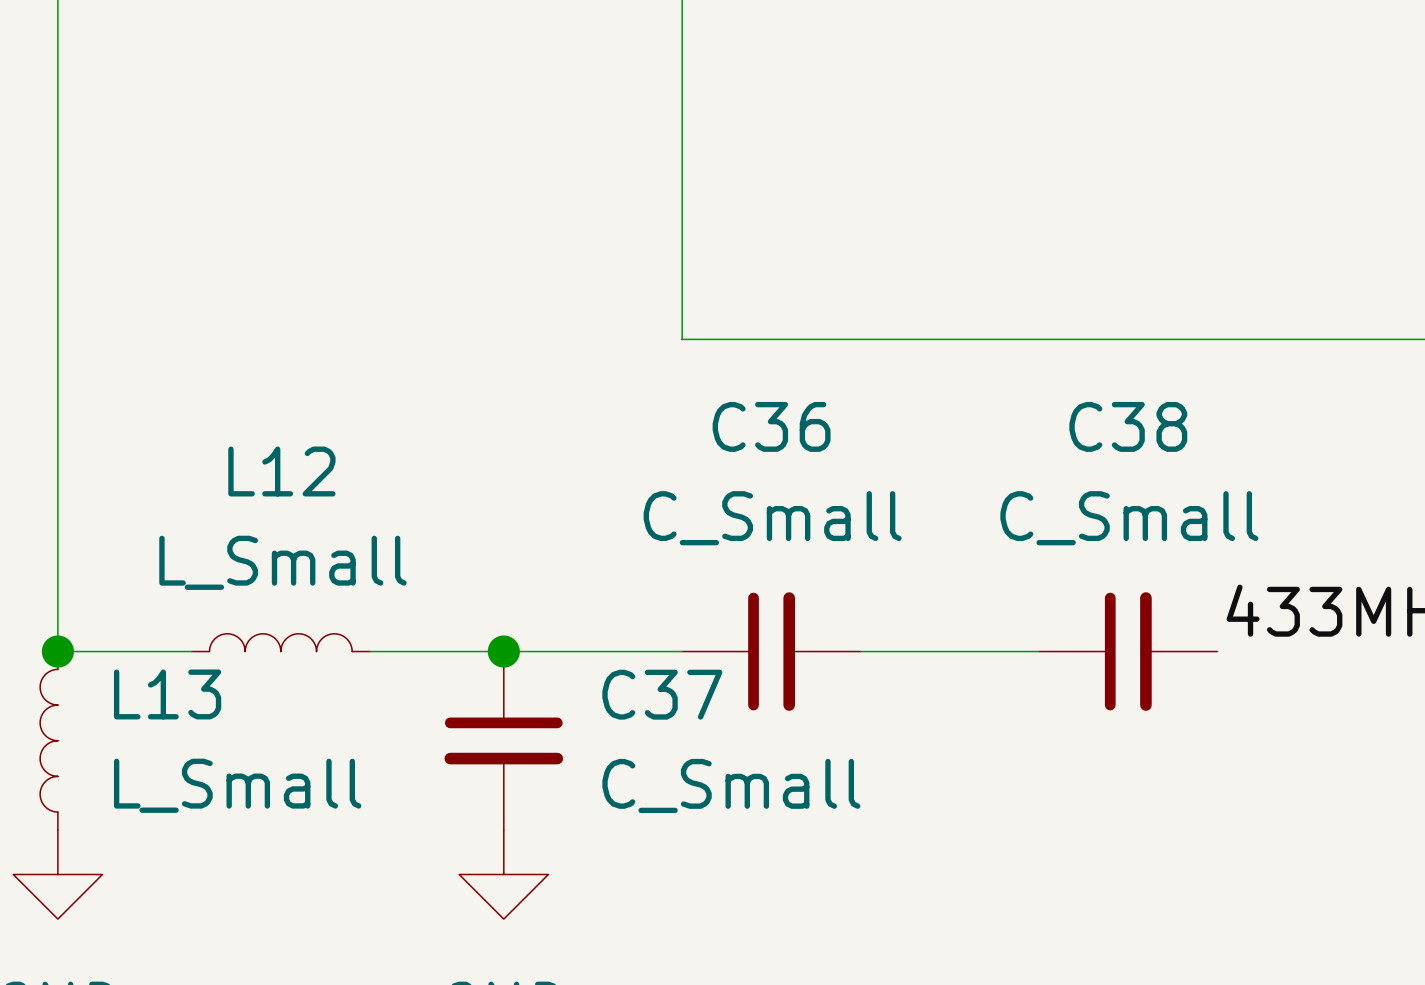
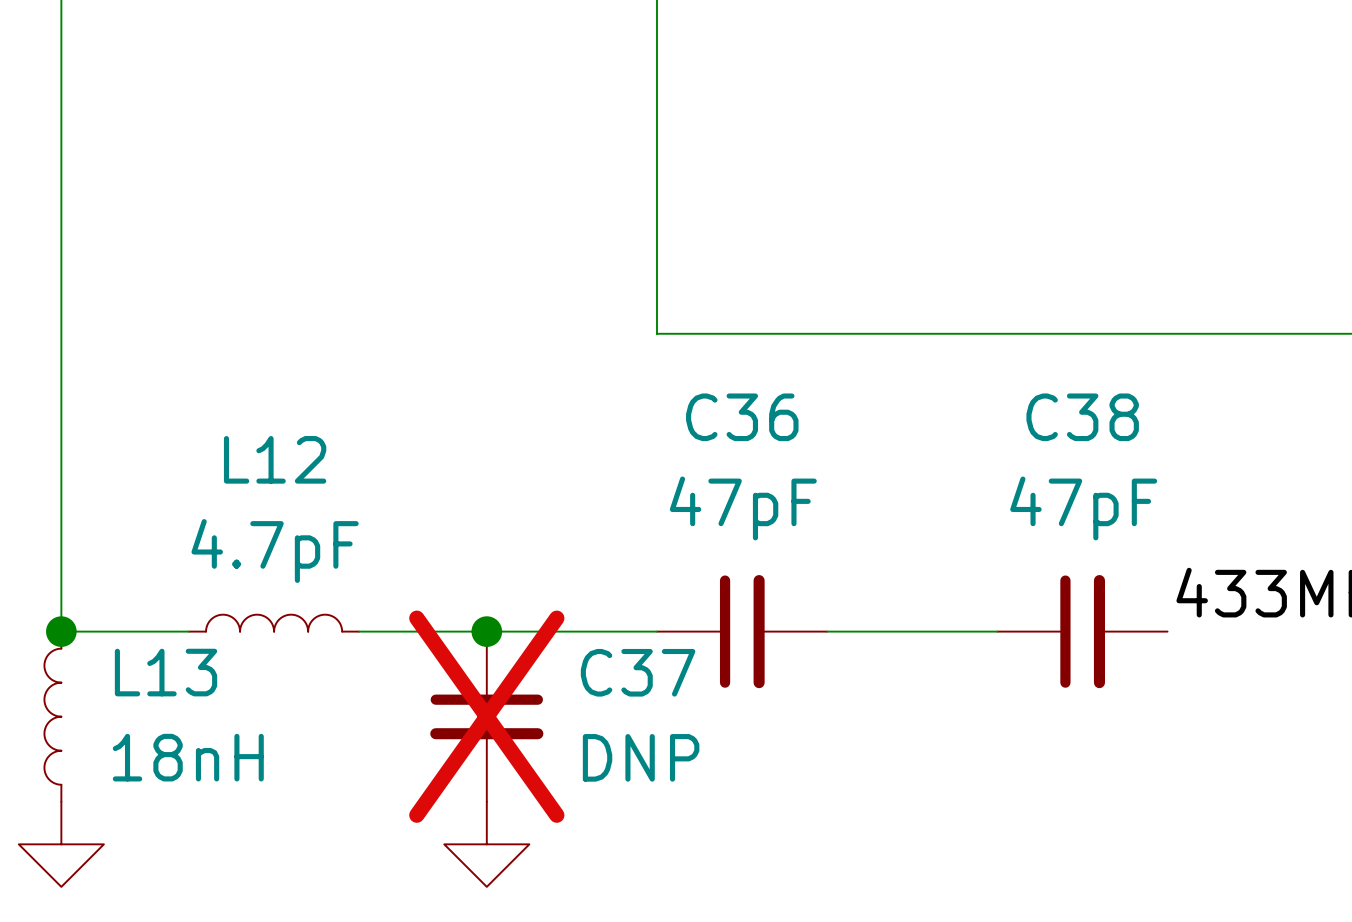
C36 value: C_Small (772, 518) -> 47pF (743, 508)
C38 value: C_Small (1129, 518) -> 47pF (1083, 508)
L12 value: L_Small (282, 562) -> 4.7pF (275, 551)
C37 do-not-place cross: none -> (486, 716)
L13 value: L_Small (237, 785) -> 18nH (188, 757)
C37 value: C_Small (731, 785) -> DNP (641, 757)

